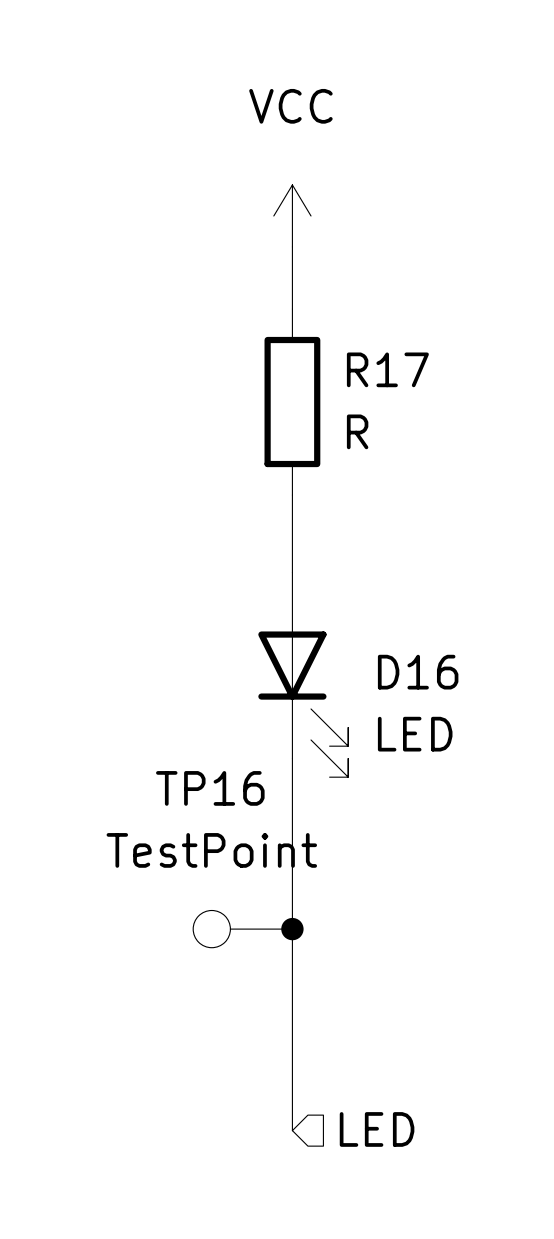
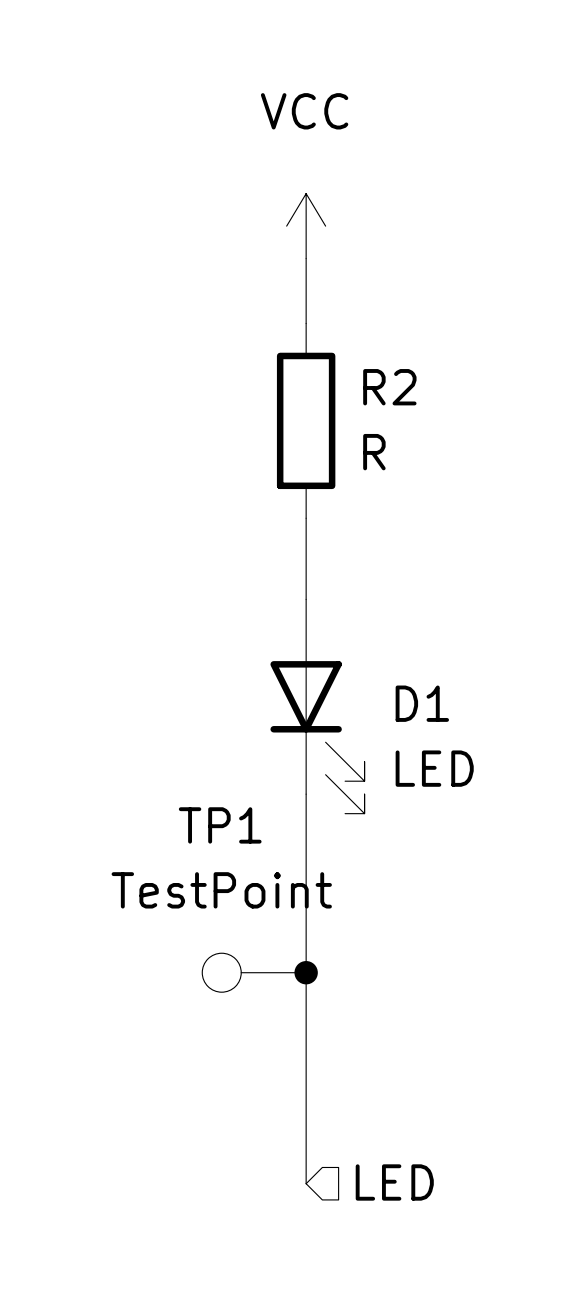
R17 name: R17 (387, 369) -> R2 (389, 387)
D16 name: D16 (418, 672) -> D1 (422, 703)
TP16 name: TP16 (210, 788) -> TP1 (220, 825)

